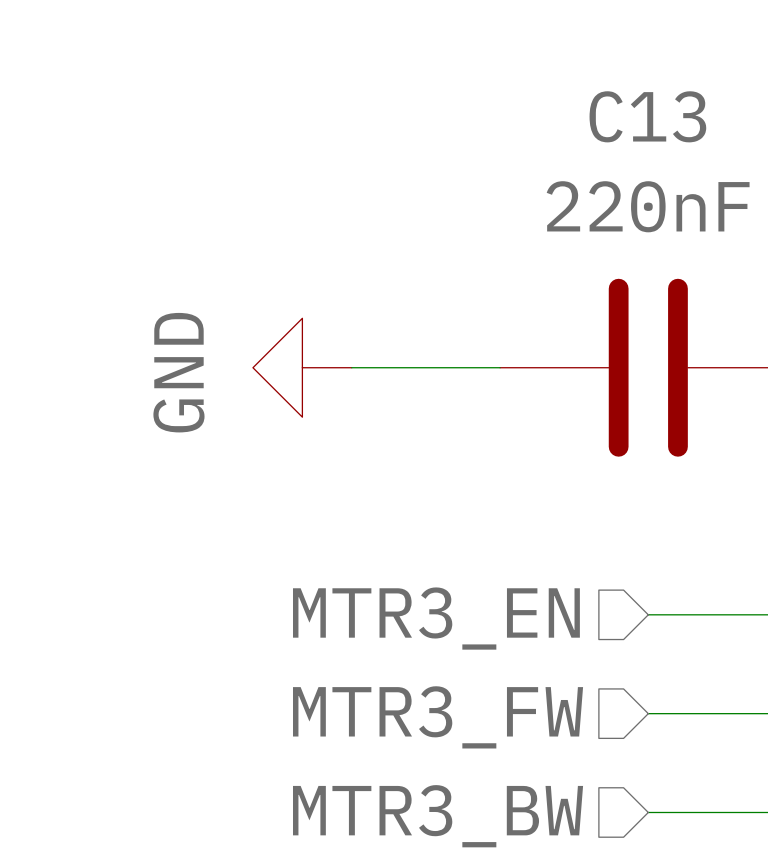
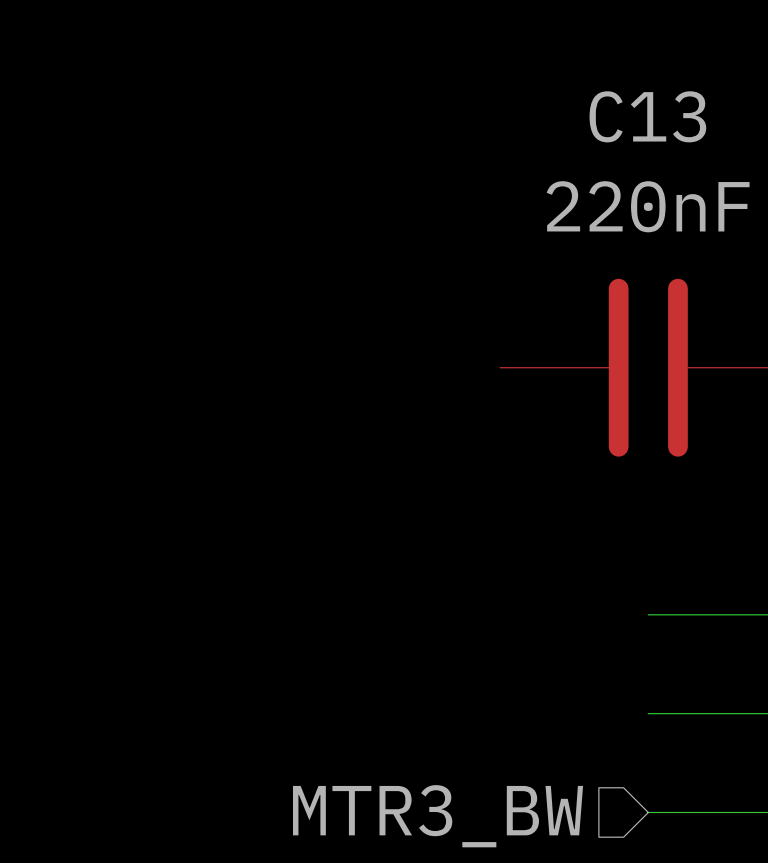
power symbol: GND (302, 367) -> none
wire: (351, 367) (500, 367) -> none
hierarchical label: MTR3_EN (436, 618) -> none
hierarchical label: MTR3_FW (438, 717) -> none

